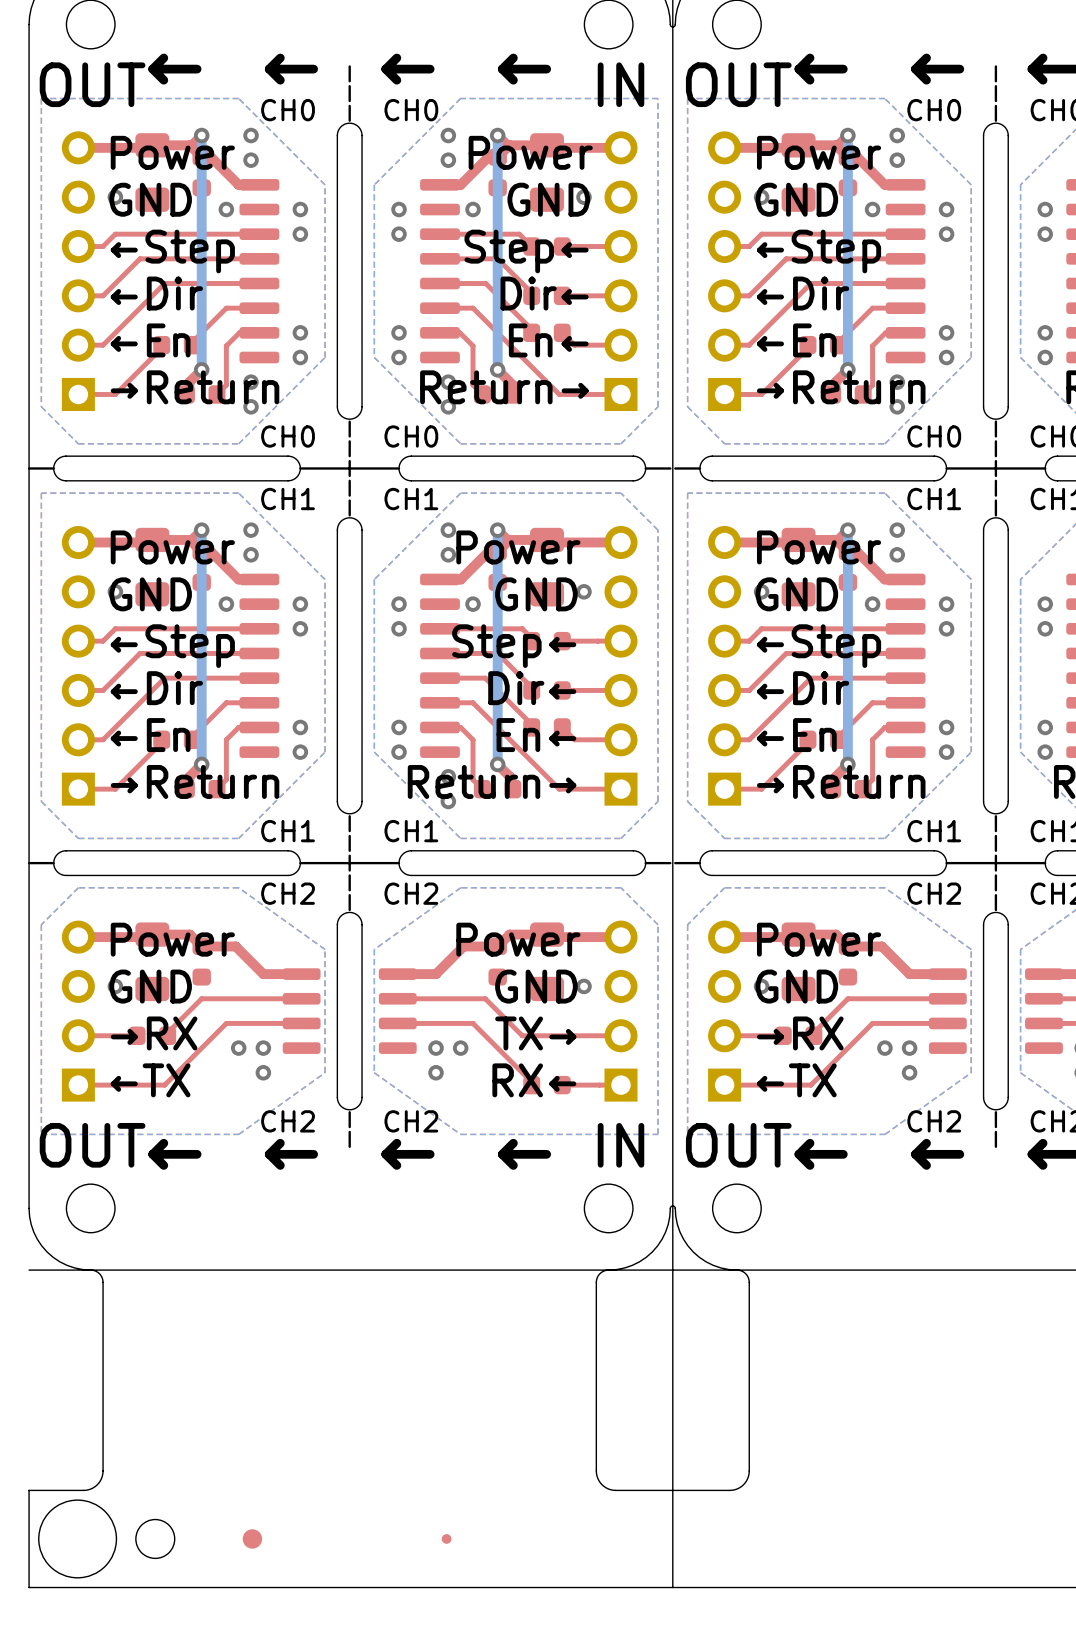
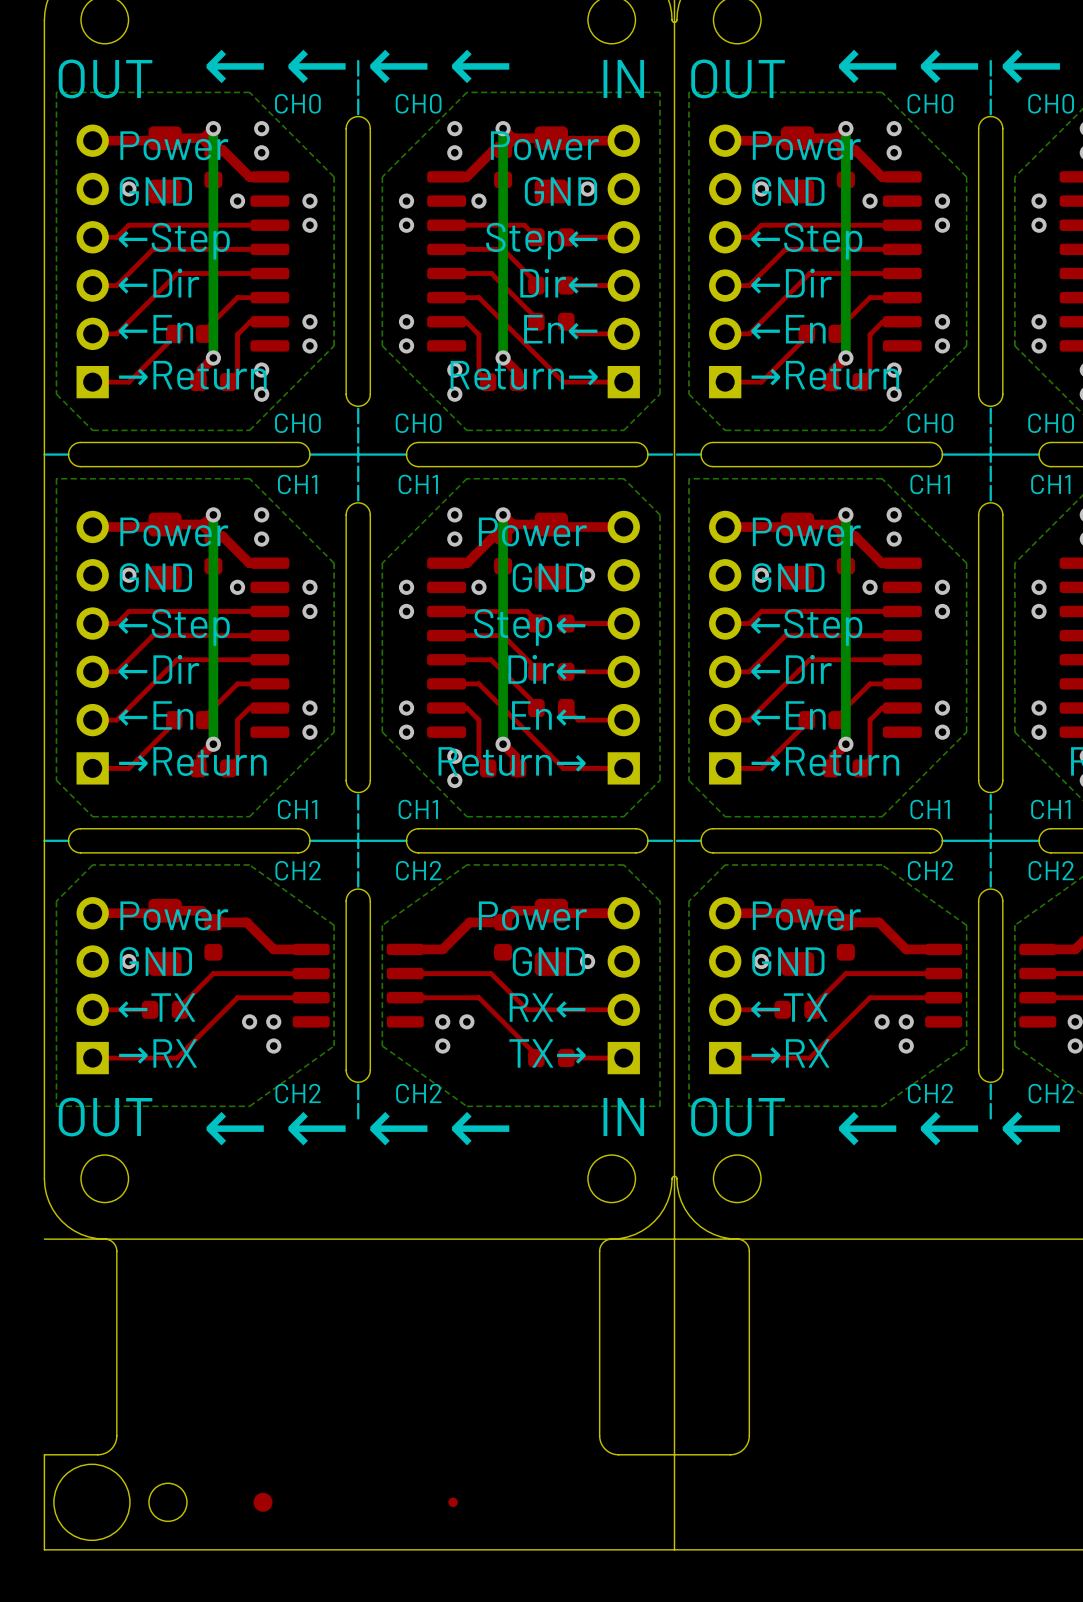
text: →RX (154, 1033) -> ←TX (156, 1007)
text: TX→ (535, 1033) -> RX← (547, 1007)
text: →RX (800, 1033) -> ←TX (789, 1007)
text: ←TX (150, 1080) -> →RX (158, 1053)
text: RX← (534, 1080) -> TX→ (547, 1053)
text: ←TX (796, 1080) -> →RX (790, 1053)

